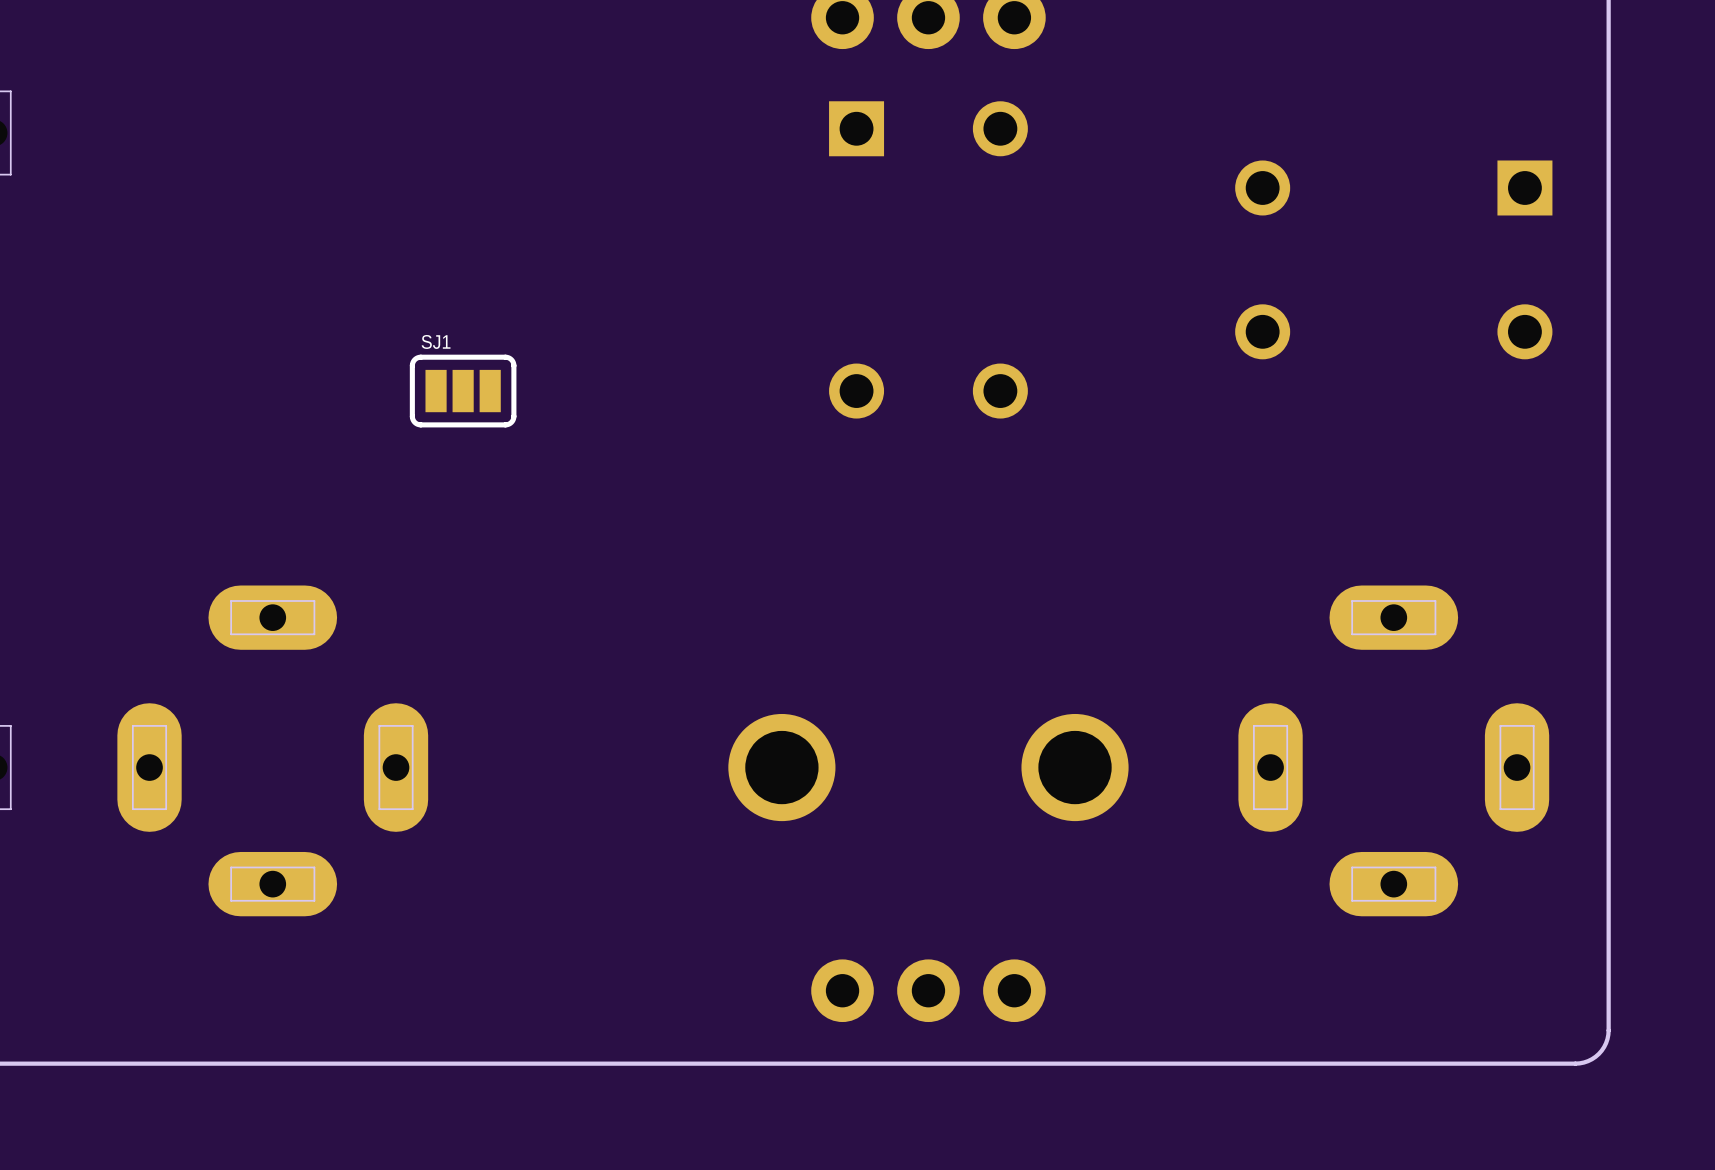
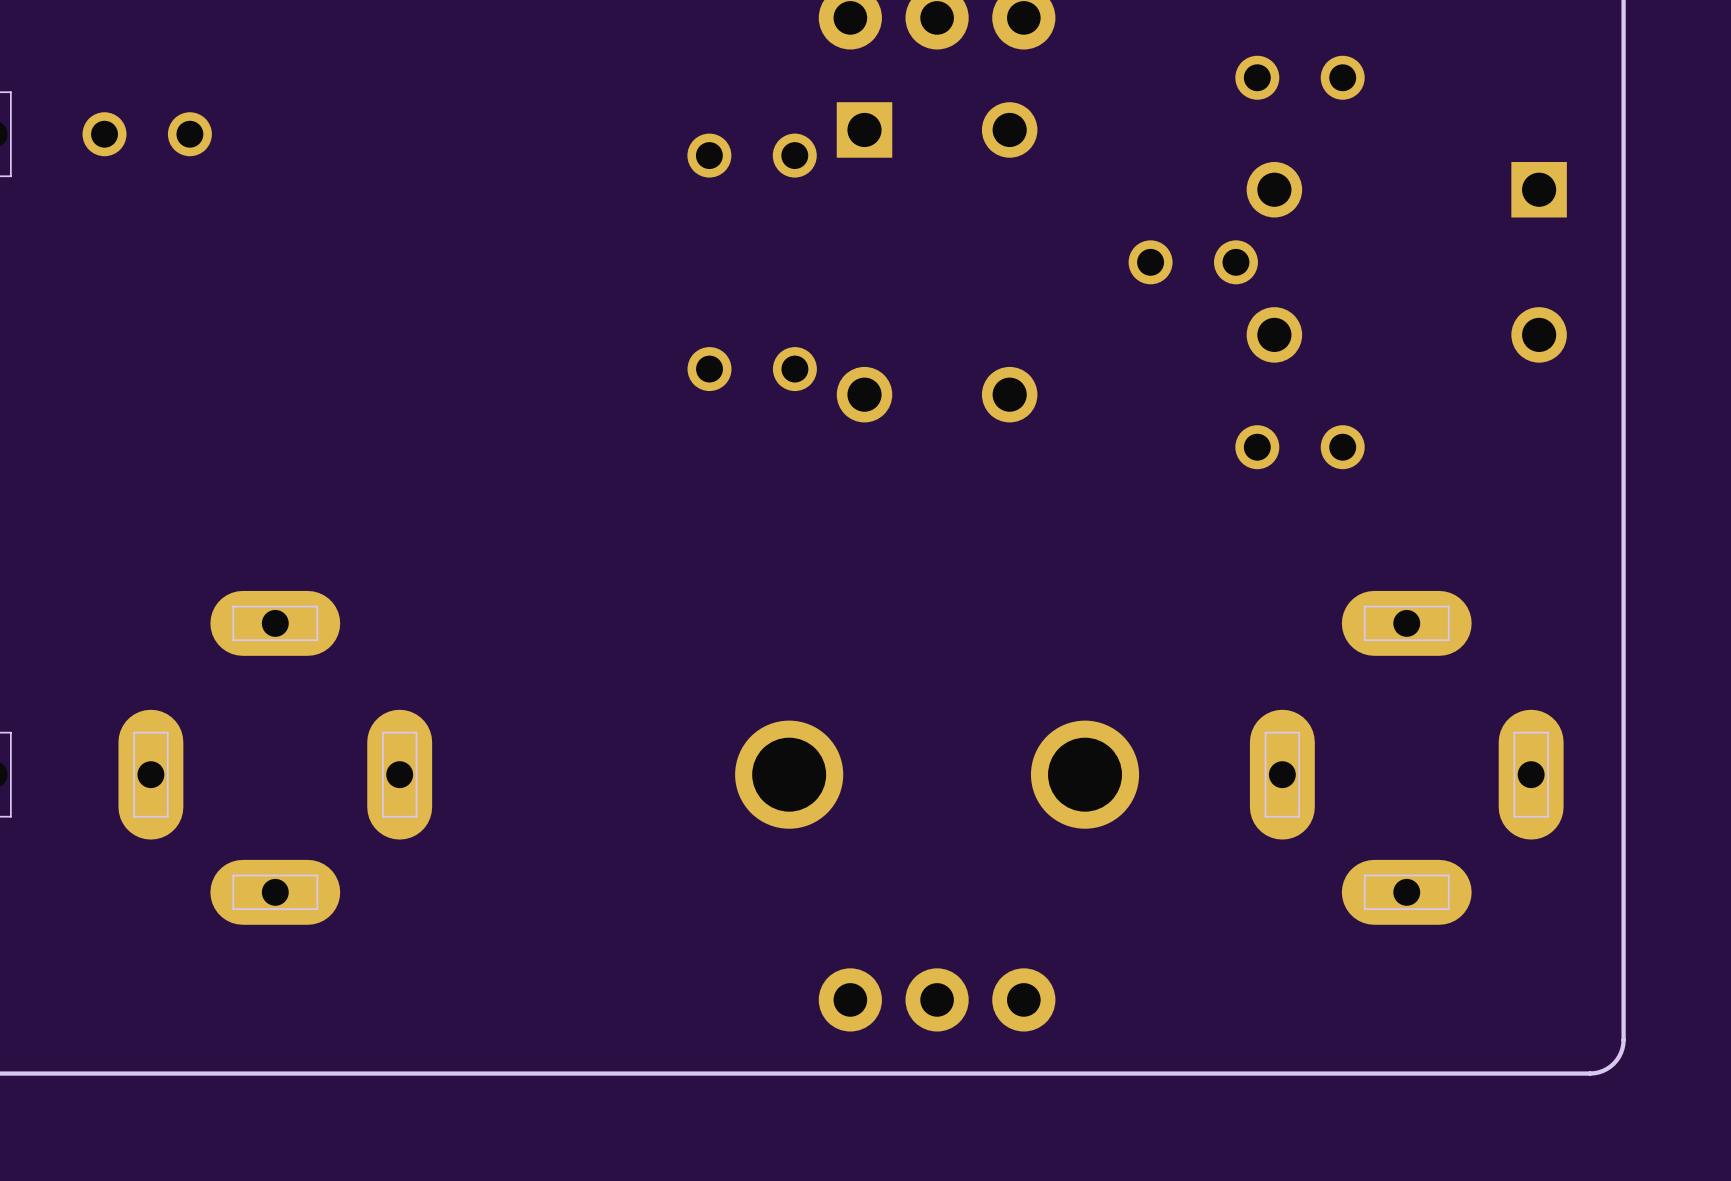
part: none -> (1300, 77)
part: none -> (147, 134)
part: none -> (752, 155)
part: none -> (1193, 262)
part: none -> (752, 369)
SJ1: (463, 391) -> none
part: none -> (1300, 447)

